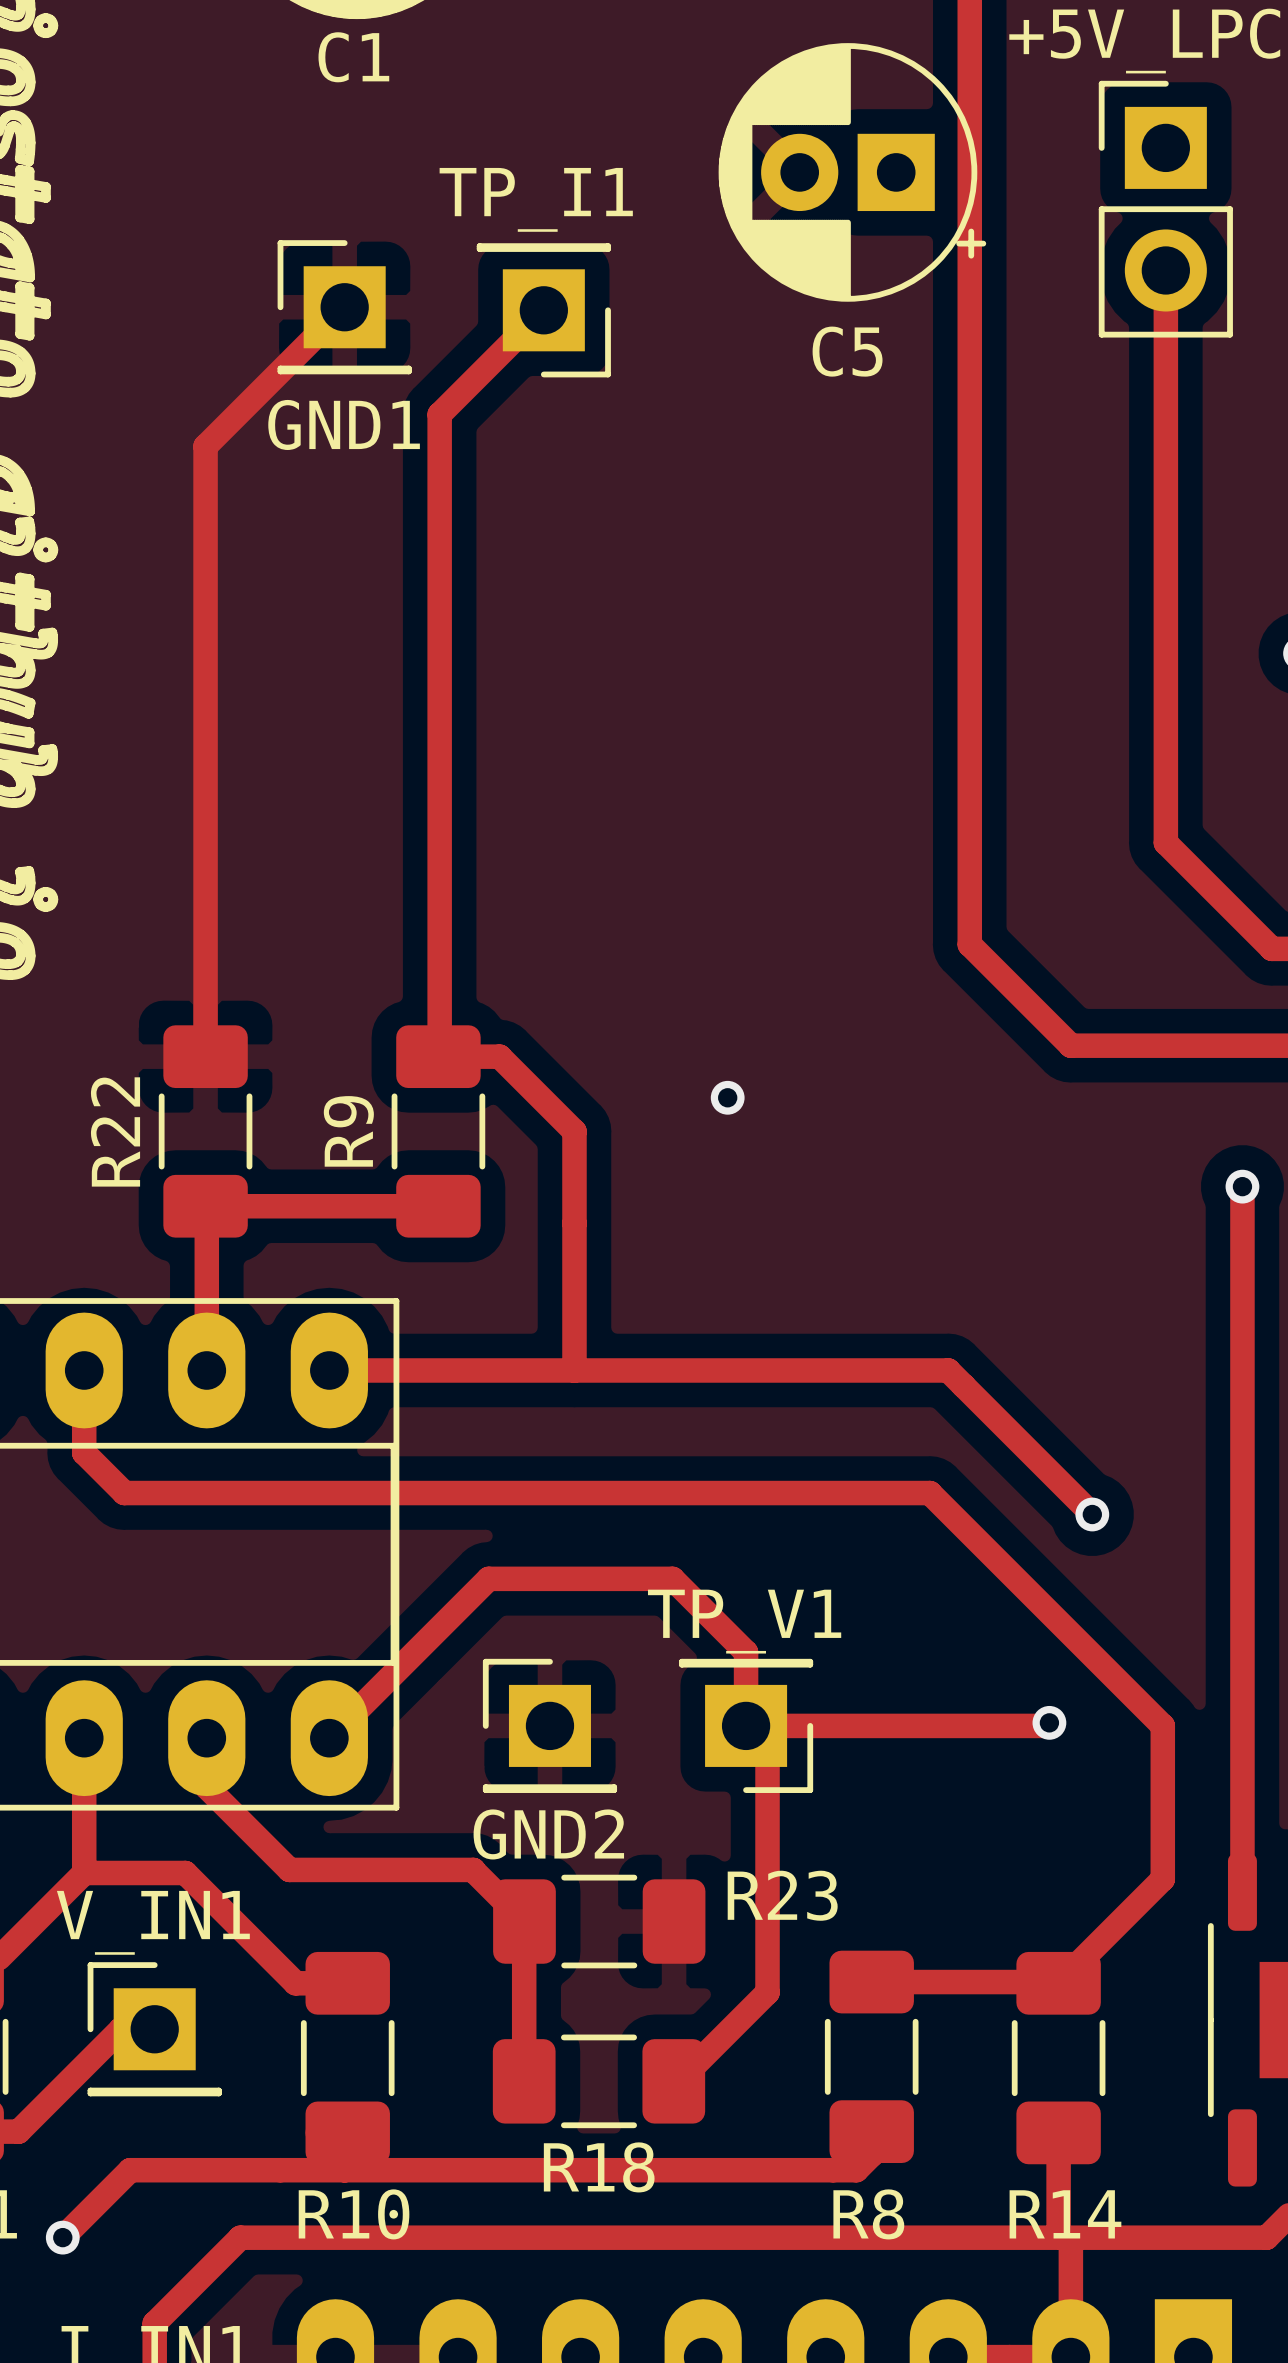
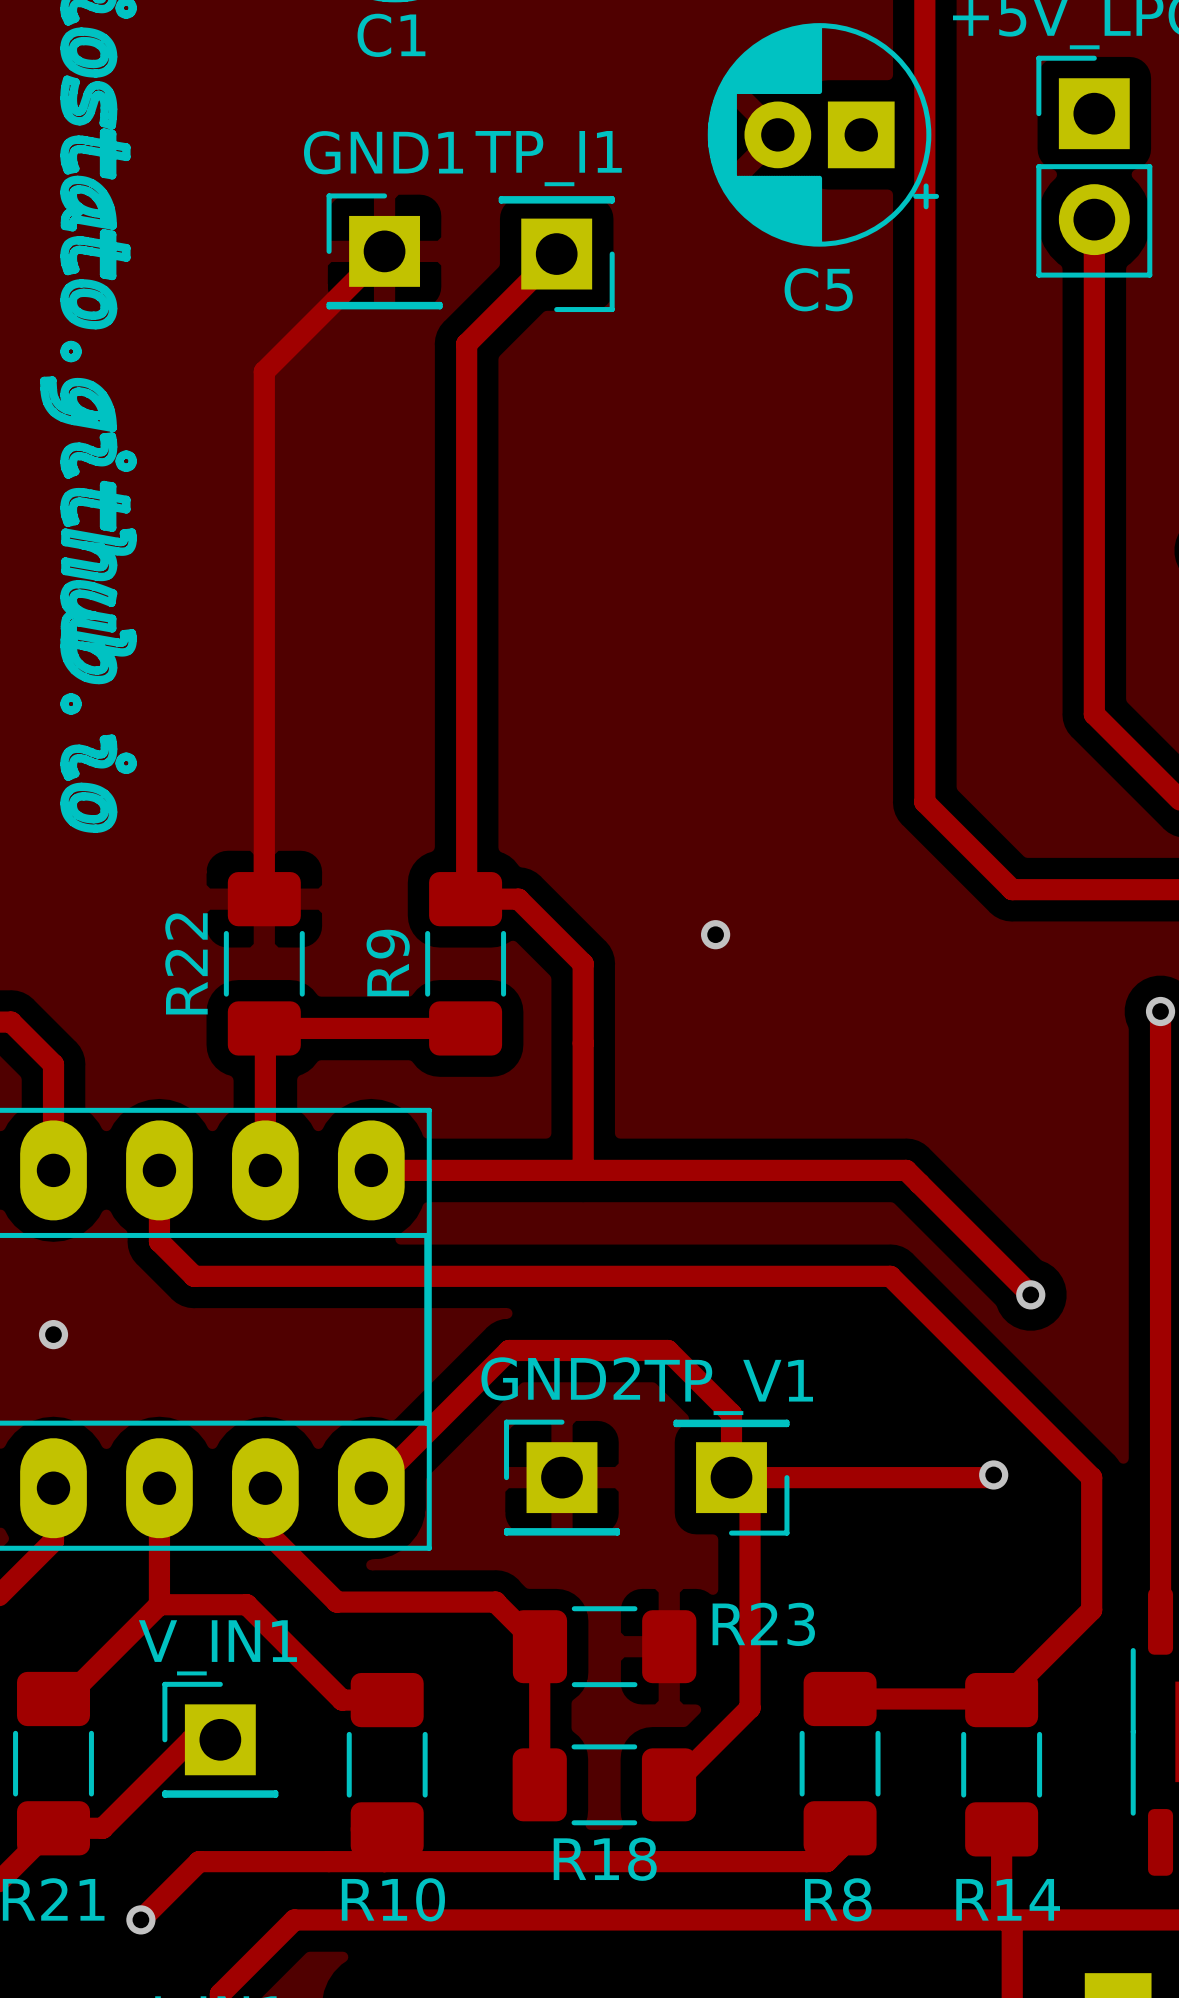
GND1 name position: GND1 (344, 424) -> GND1 (383, 152)
GND2 name position: GND2 (548, 1834) -> GND2 (560, 1378)

